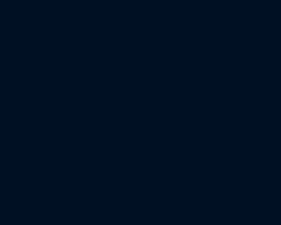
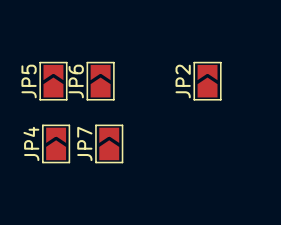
JP5: none -> (53, 81)
JP6: none -> (100, 81)
JP2: none -> (207, 81)
JP4: none -> (56, 143)
JP7: none -> (109, 143)

